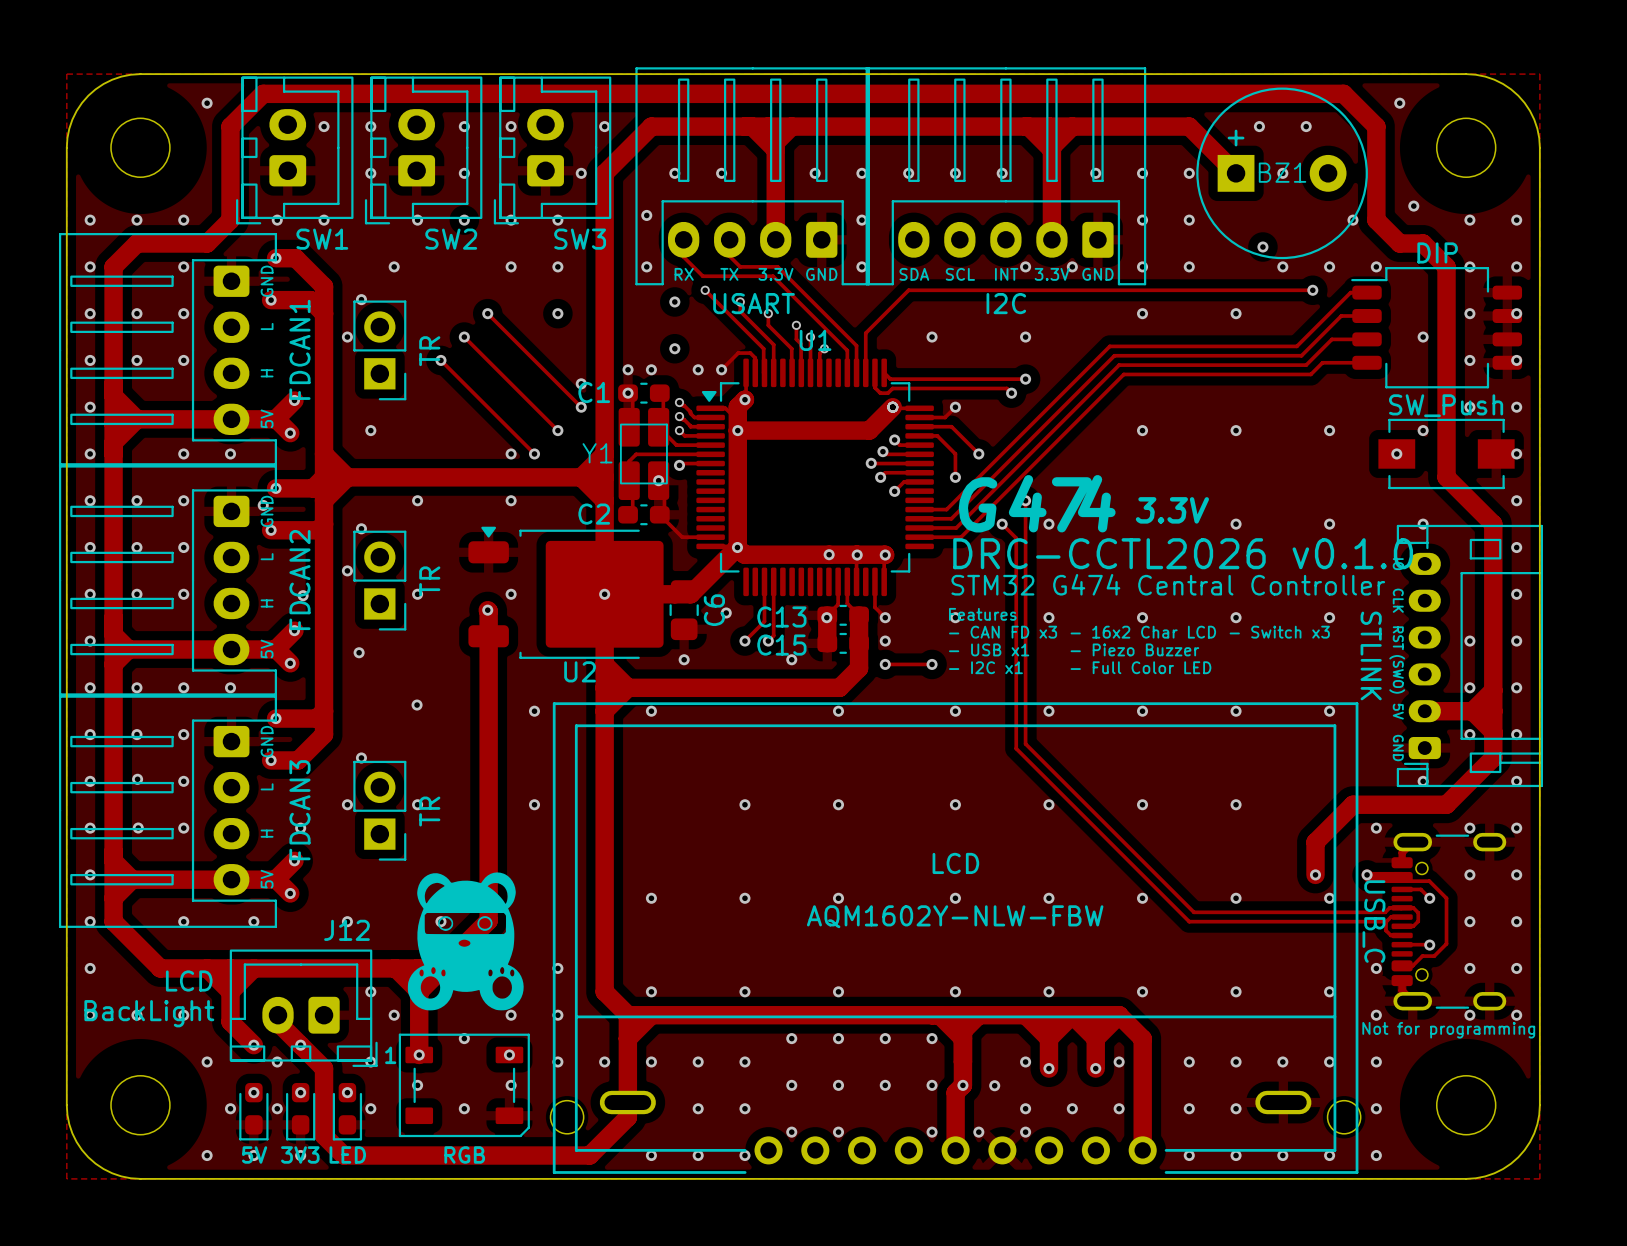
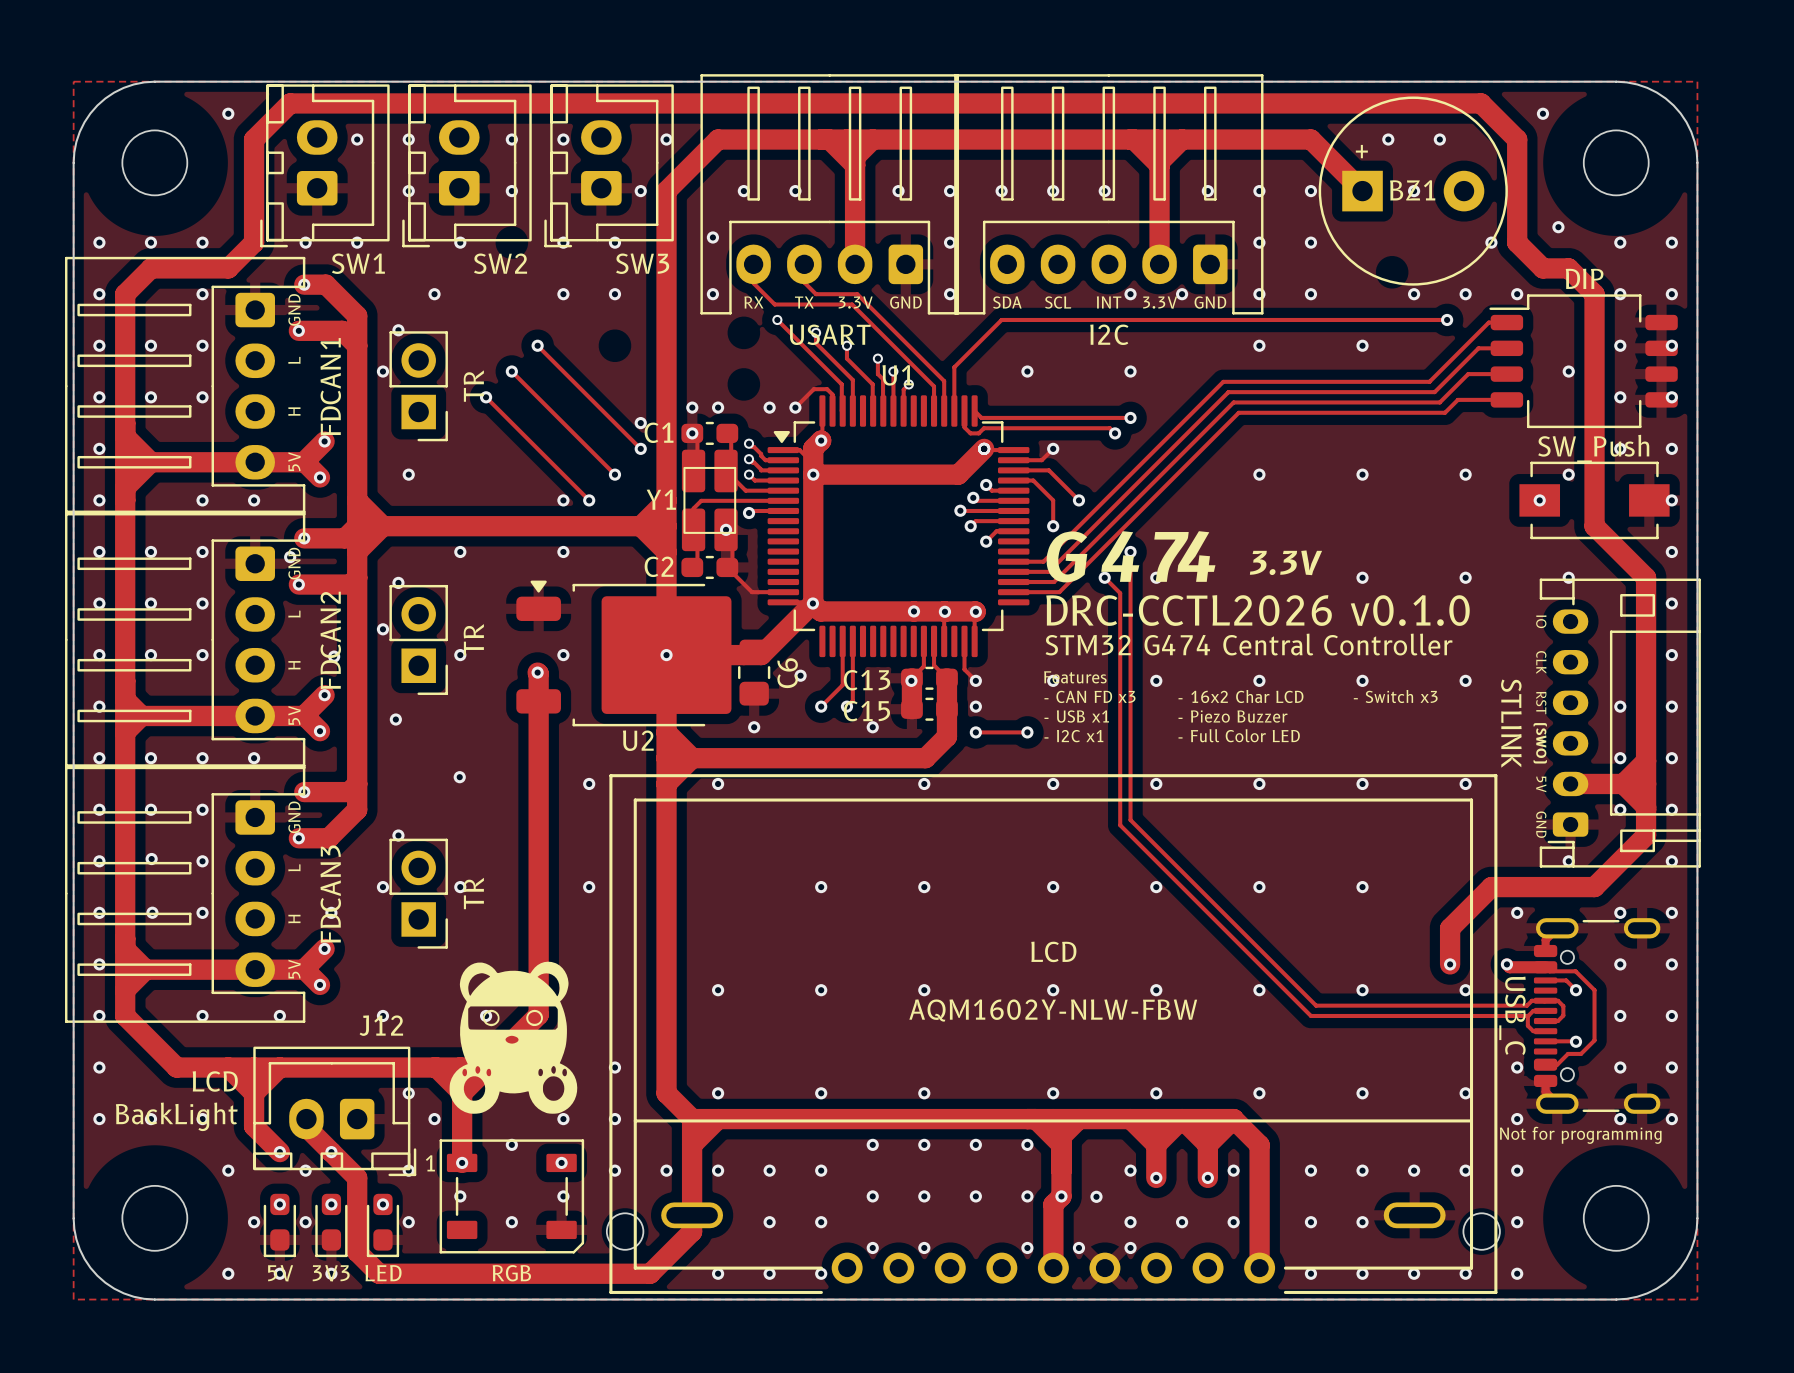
via: (464, 220) -> none
via: (1262, 247) -> none
via: (674, 301) -> none
via: (557, 313) -> none
via: (674, 348) -> none

